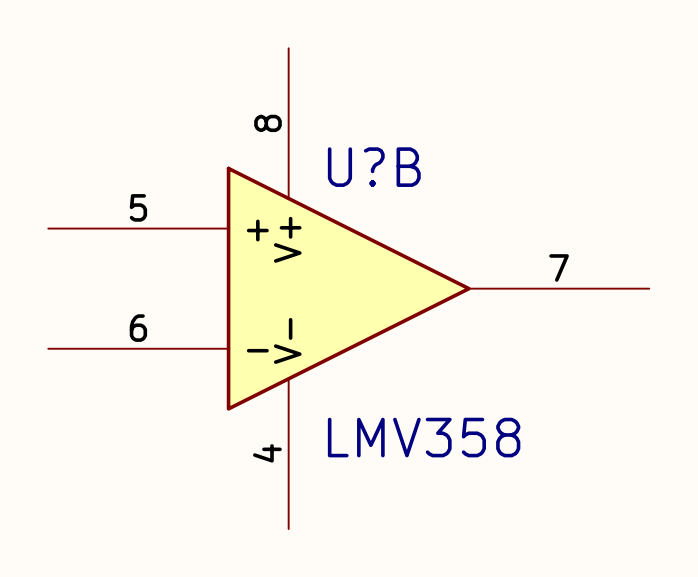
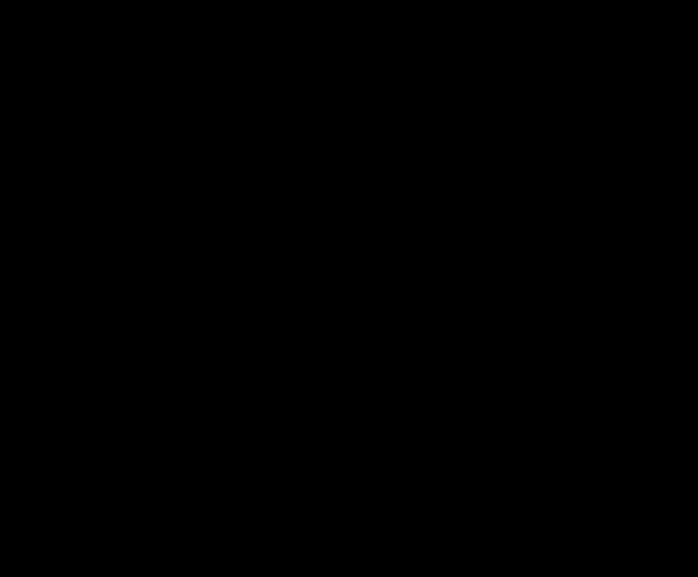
U?B: LMV358 (348, 288) -> none

